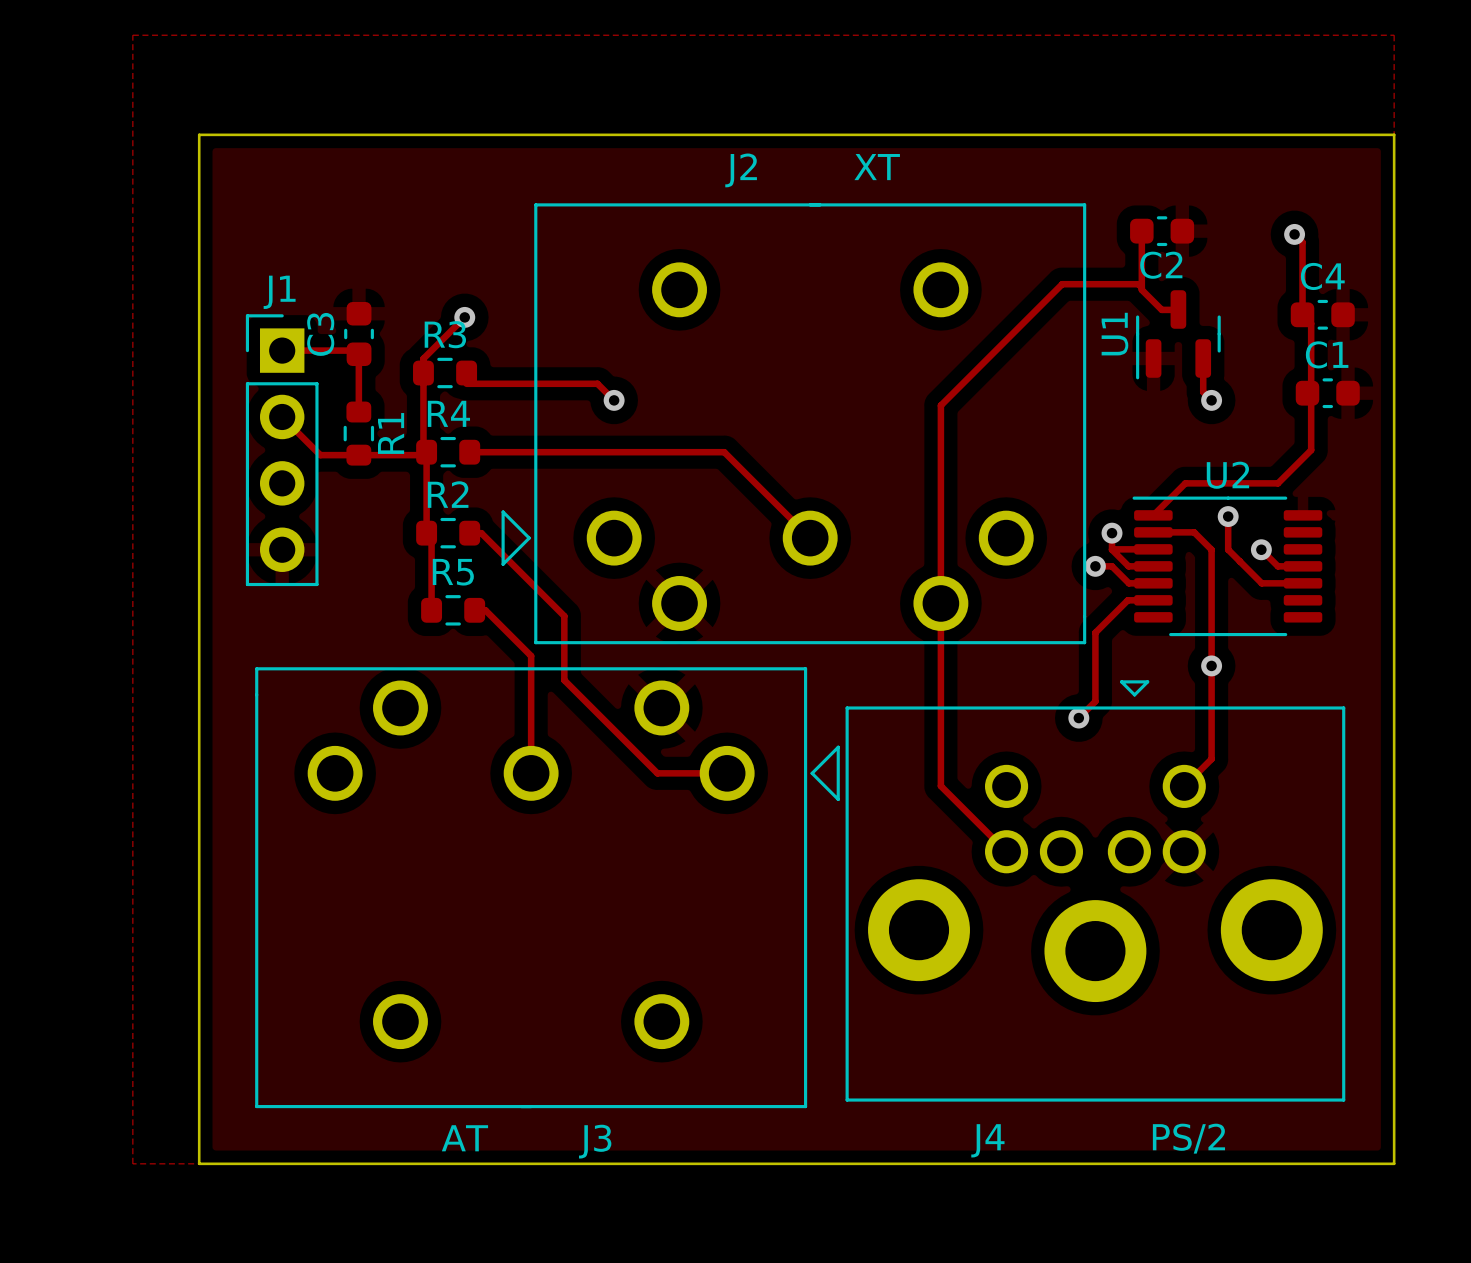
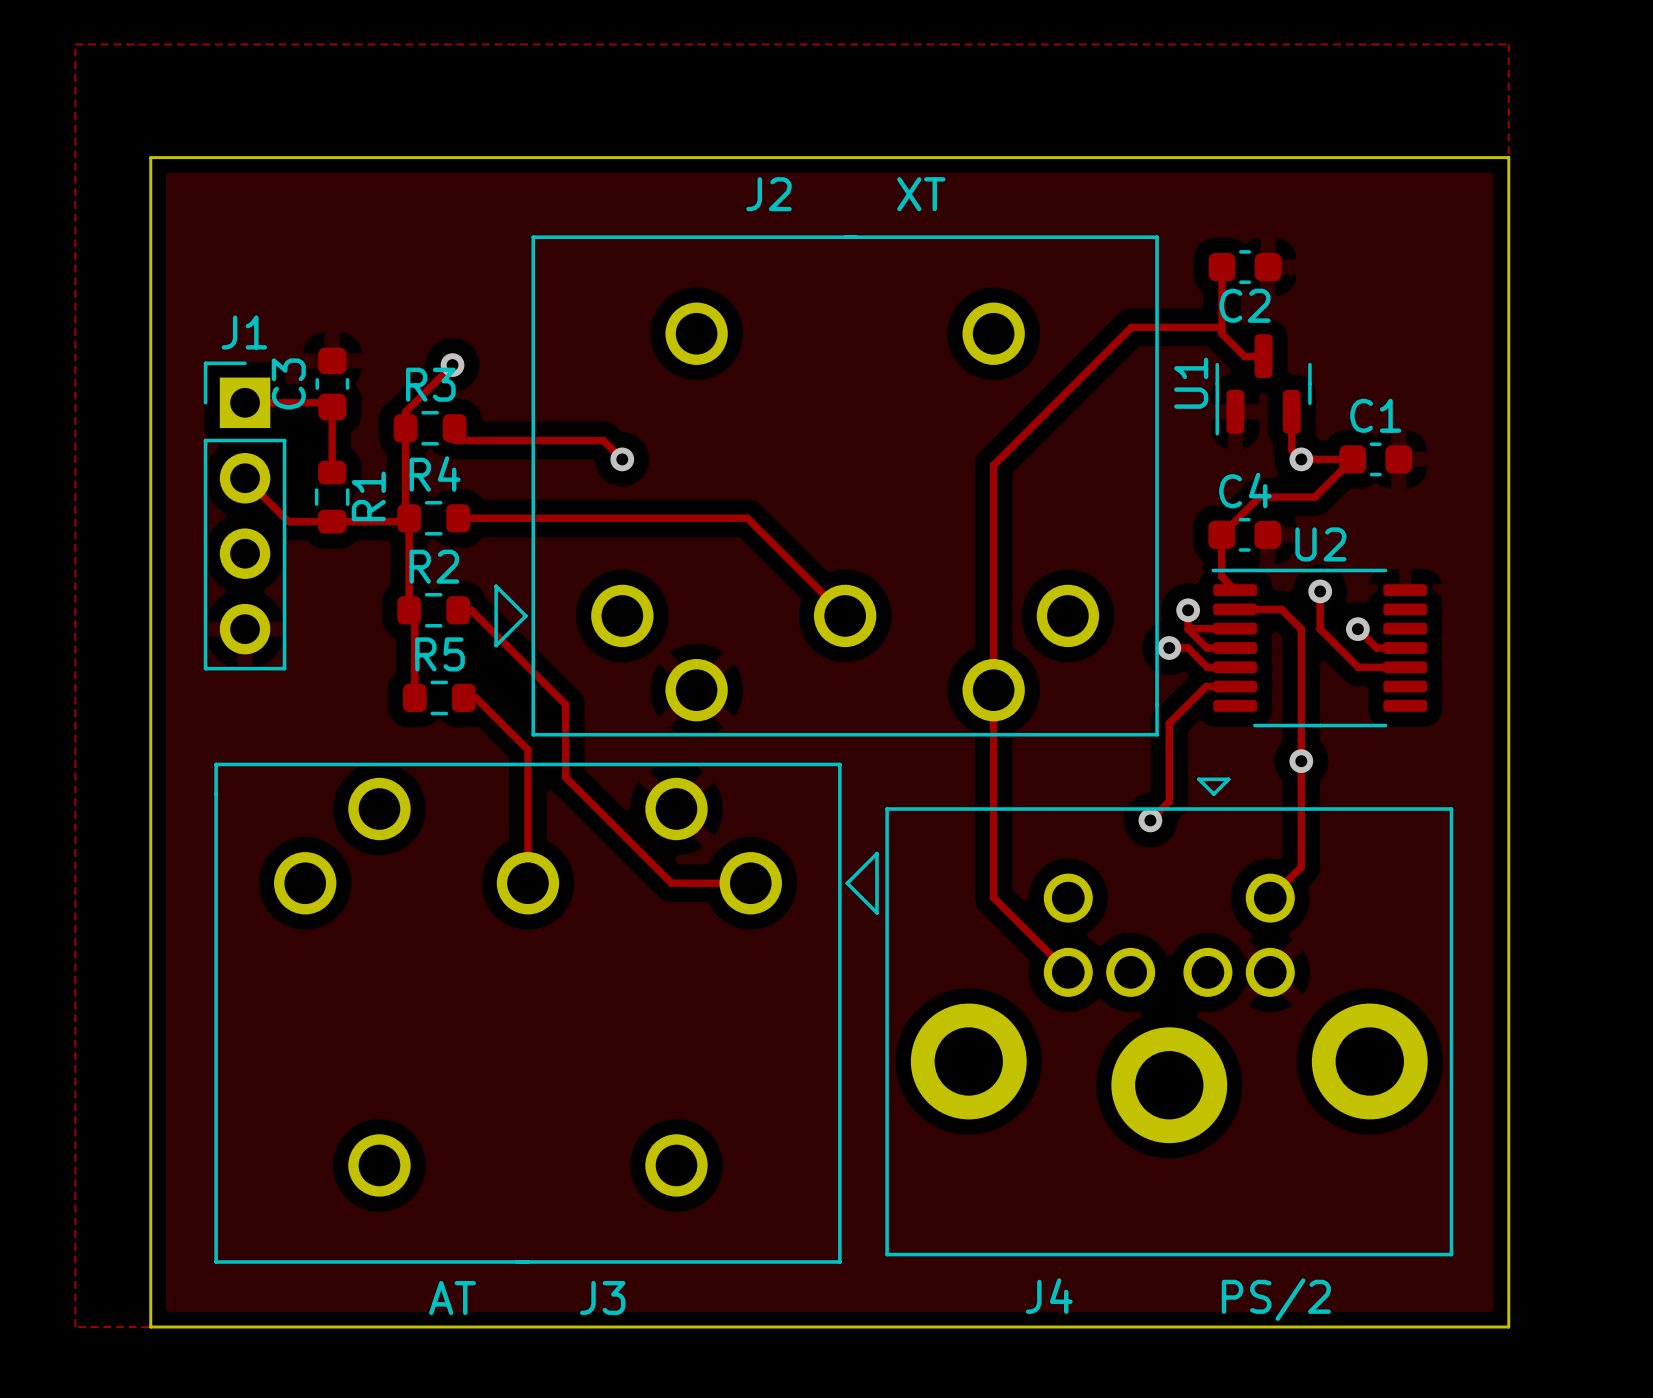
track: (1294, 234) (1302, 242) (1302, 314) (1311, 323) (1311, 450) (1277, 483) (1185, 483) (1153, 515) -> (1301, 459) (1352, 459) (1314, 497) (1259, 497) (1221, 534) (1221, 576) (1235, 590)
via: (1294, 234) -> none
C4 position: (1322, 314) -> (1244, 534)
C1 position: (1327, 393) -> (1375, 459)

